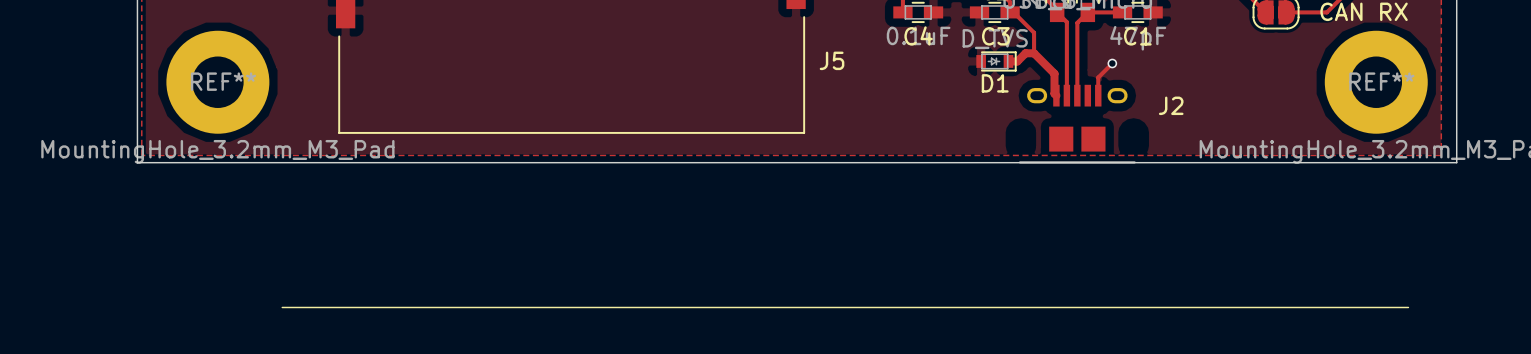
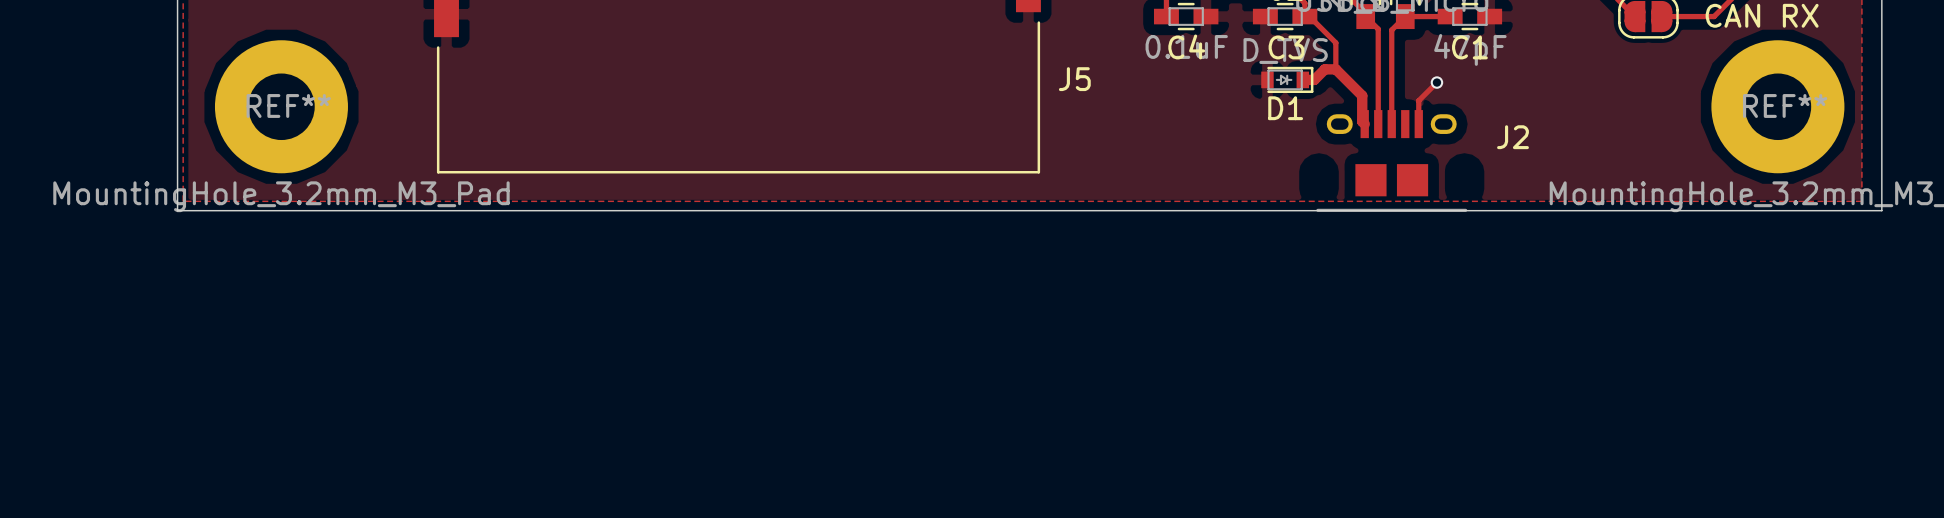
line: (282, 307) (1408, 307) -> none

